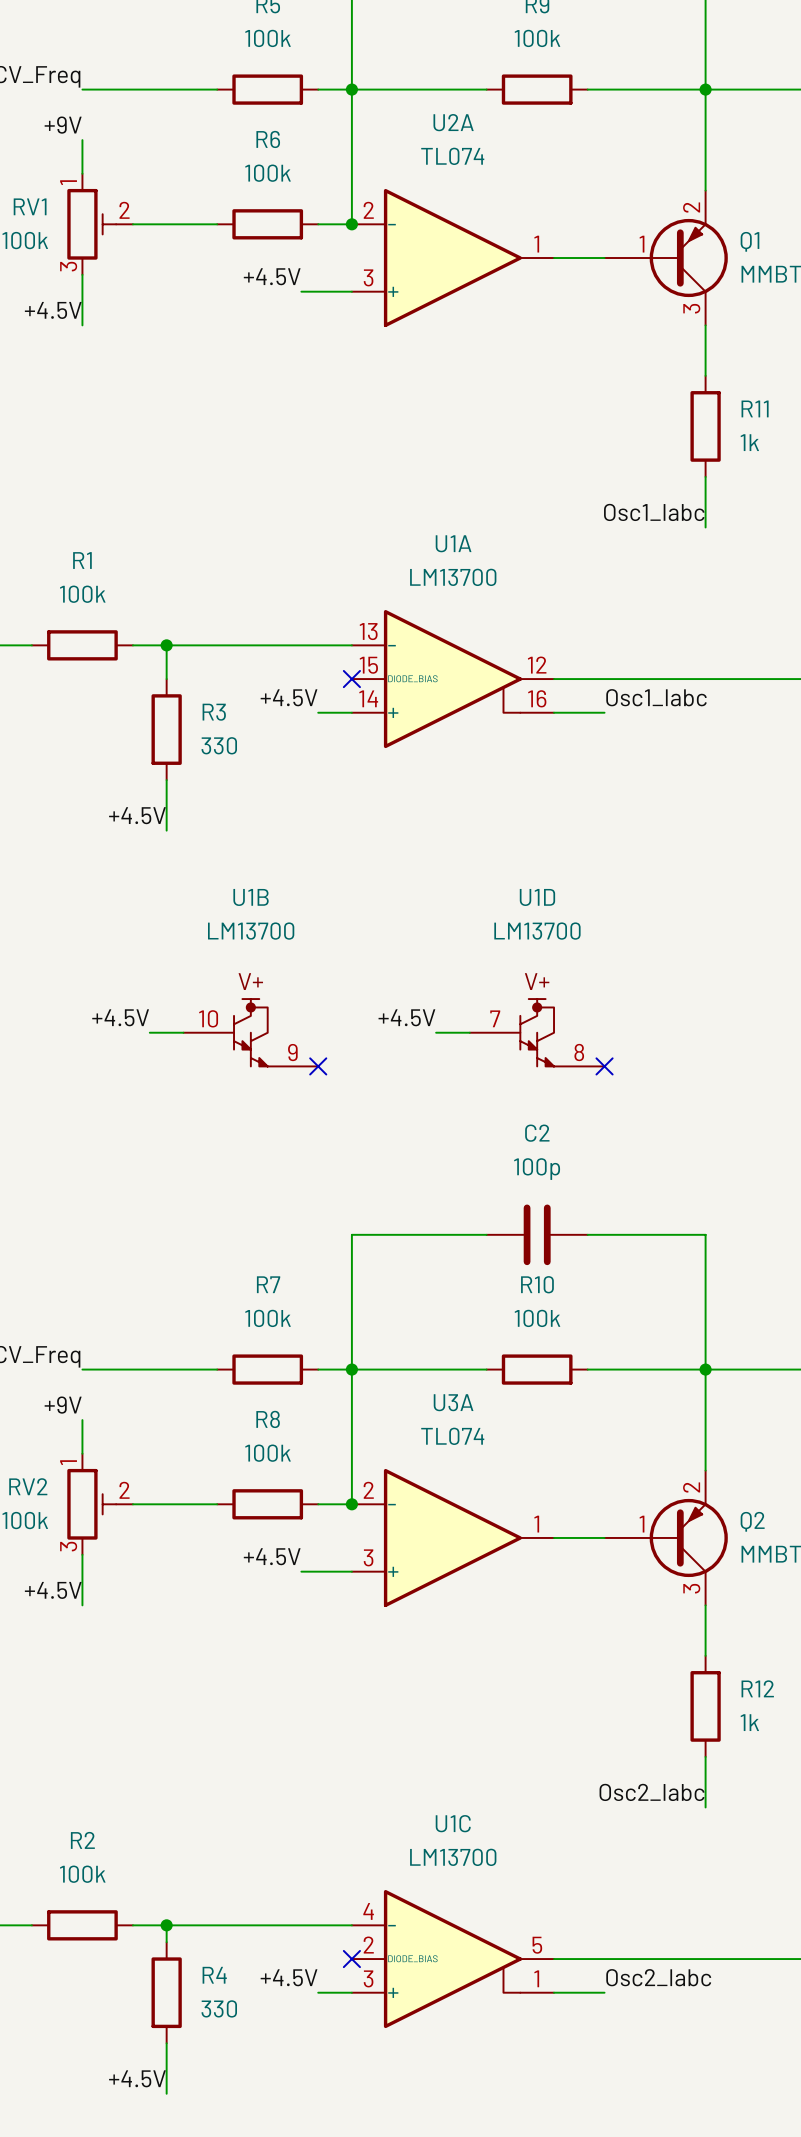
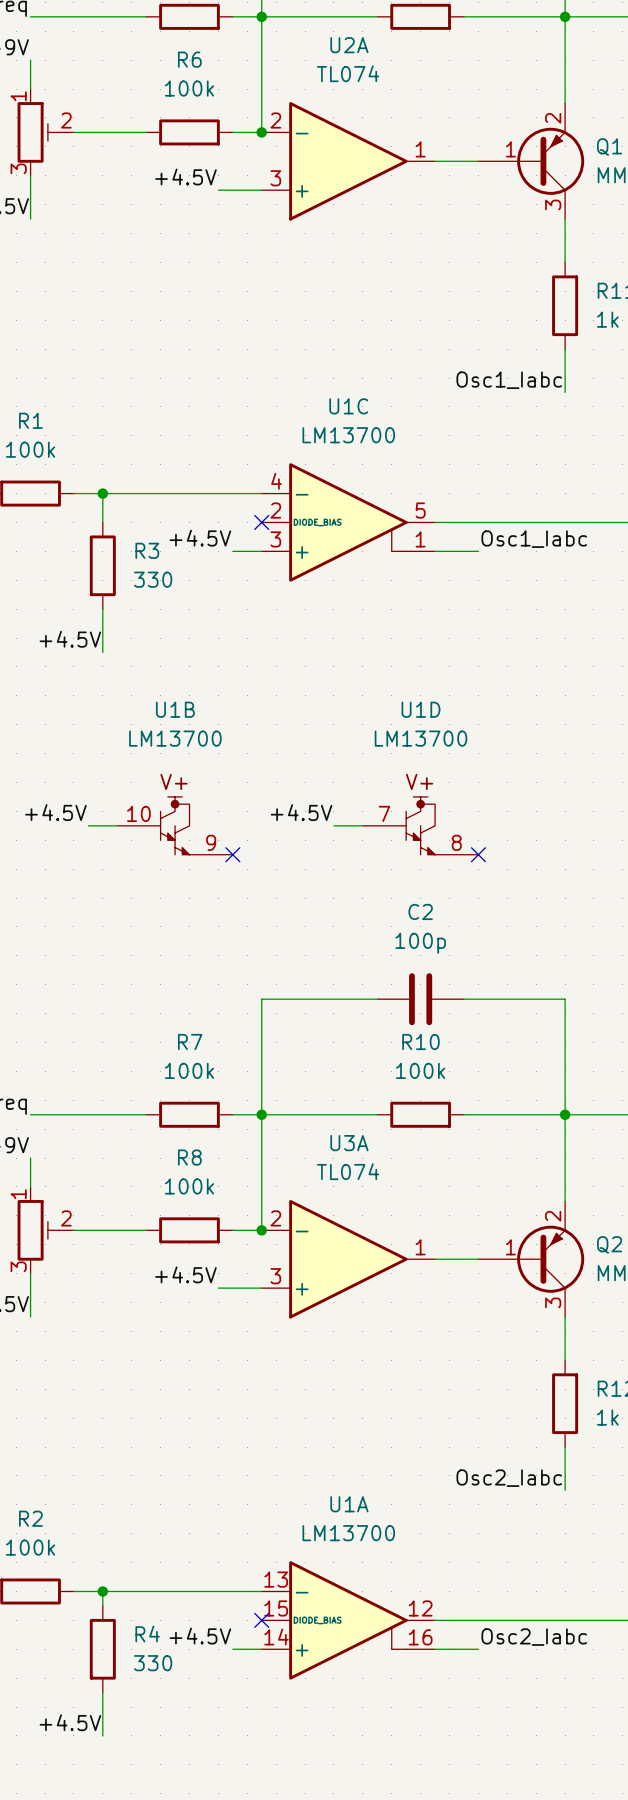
U1A position: (452, 679) -> (348, 1620)
U1C position: (452, 1959) -> (348, 522)

